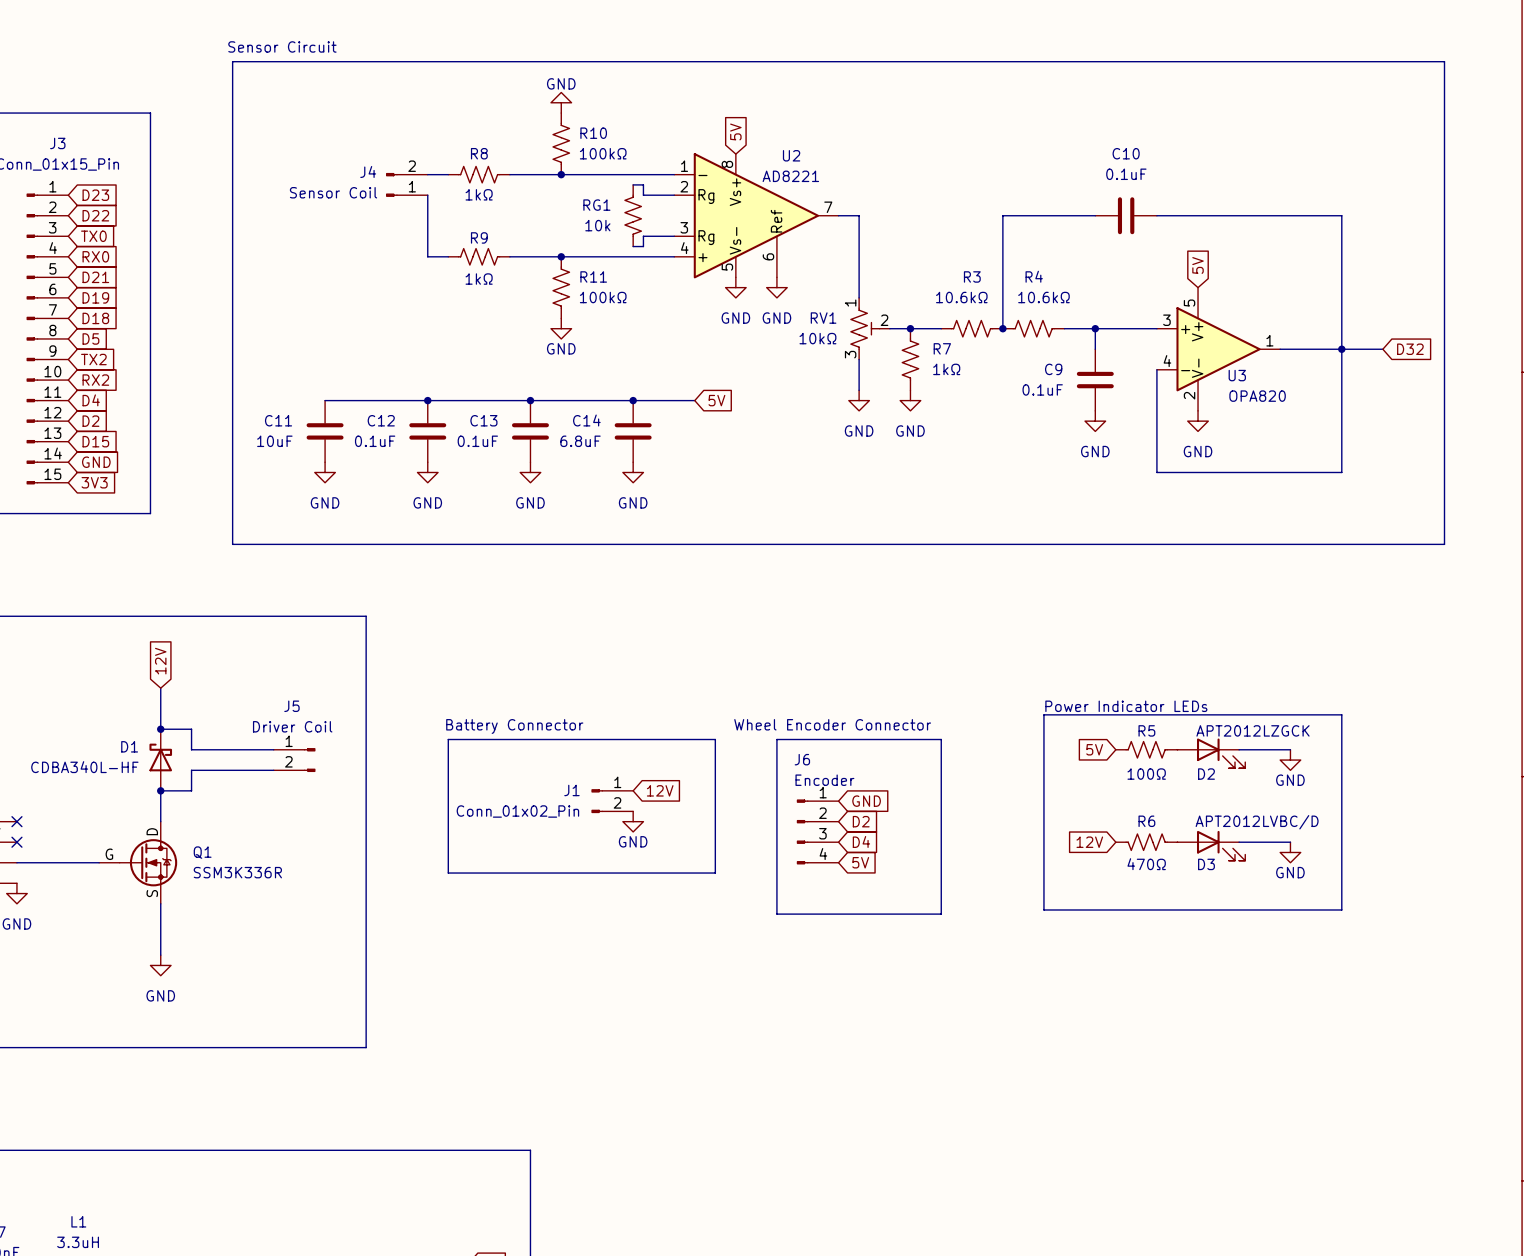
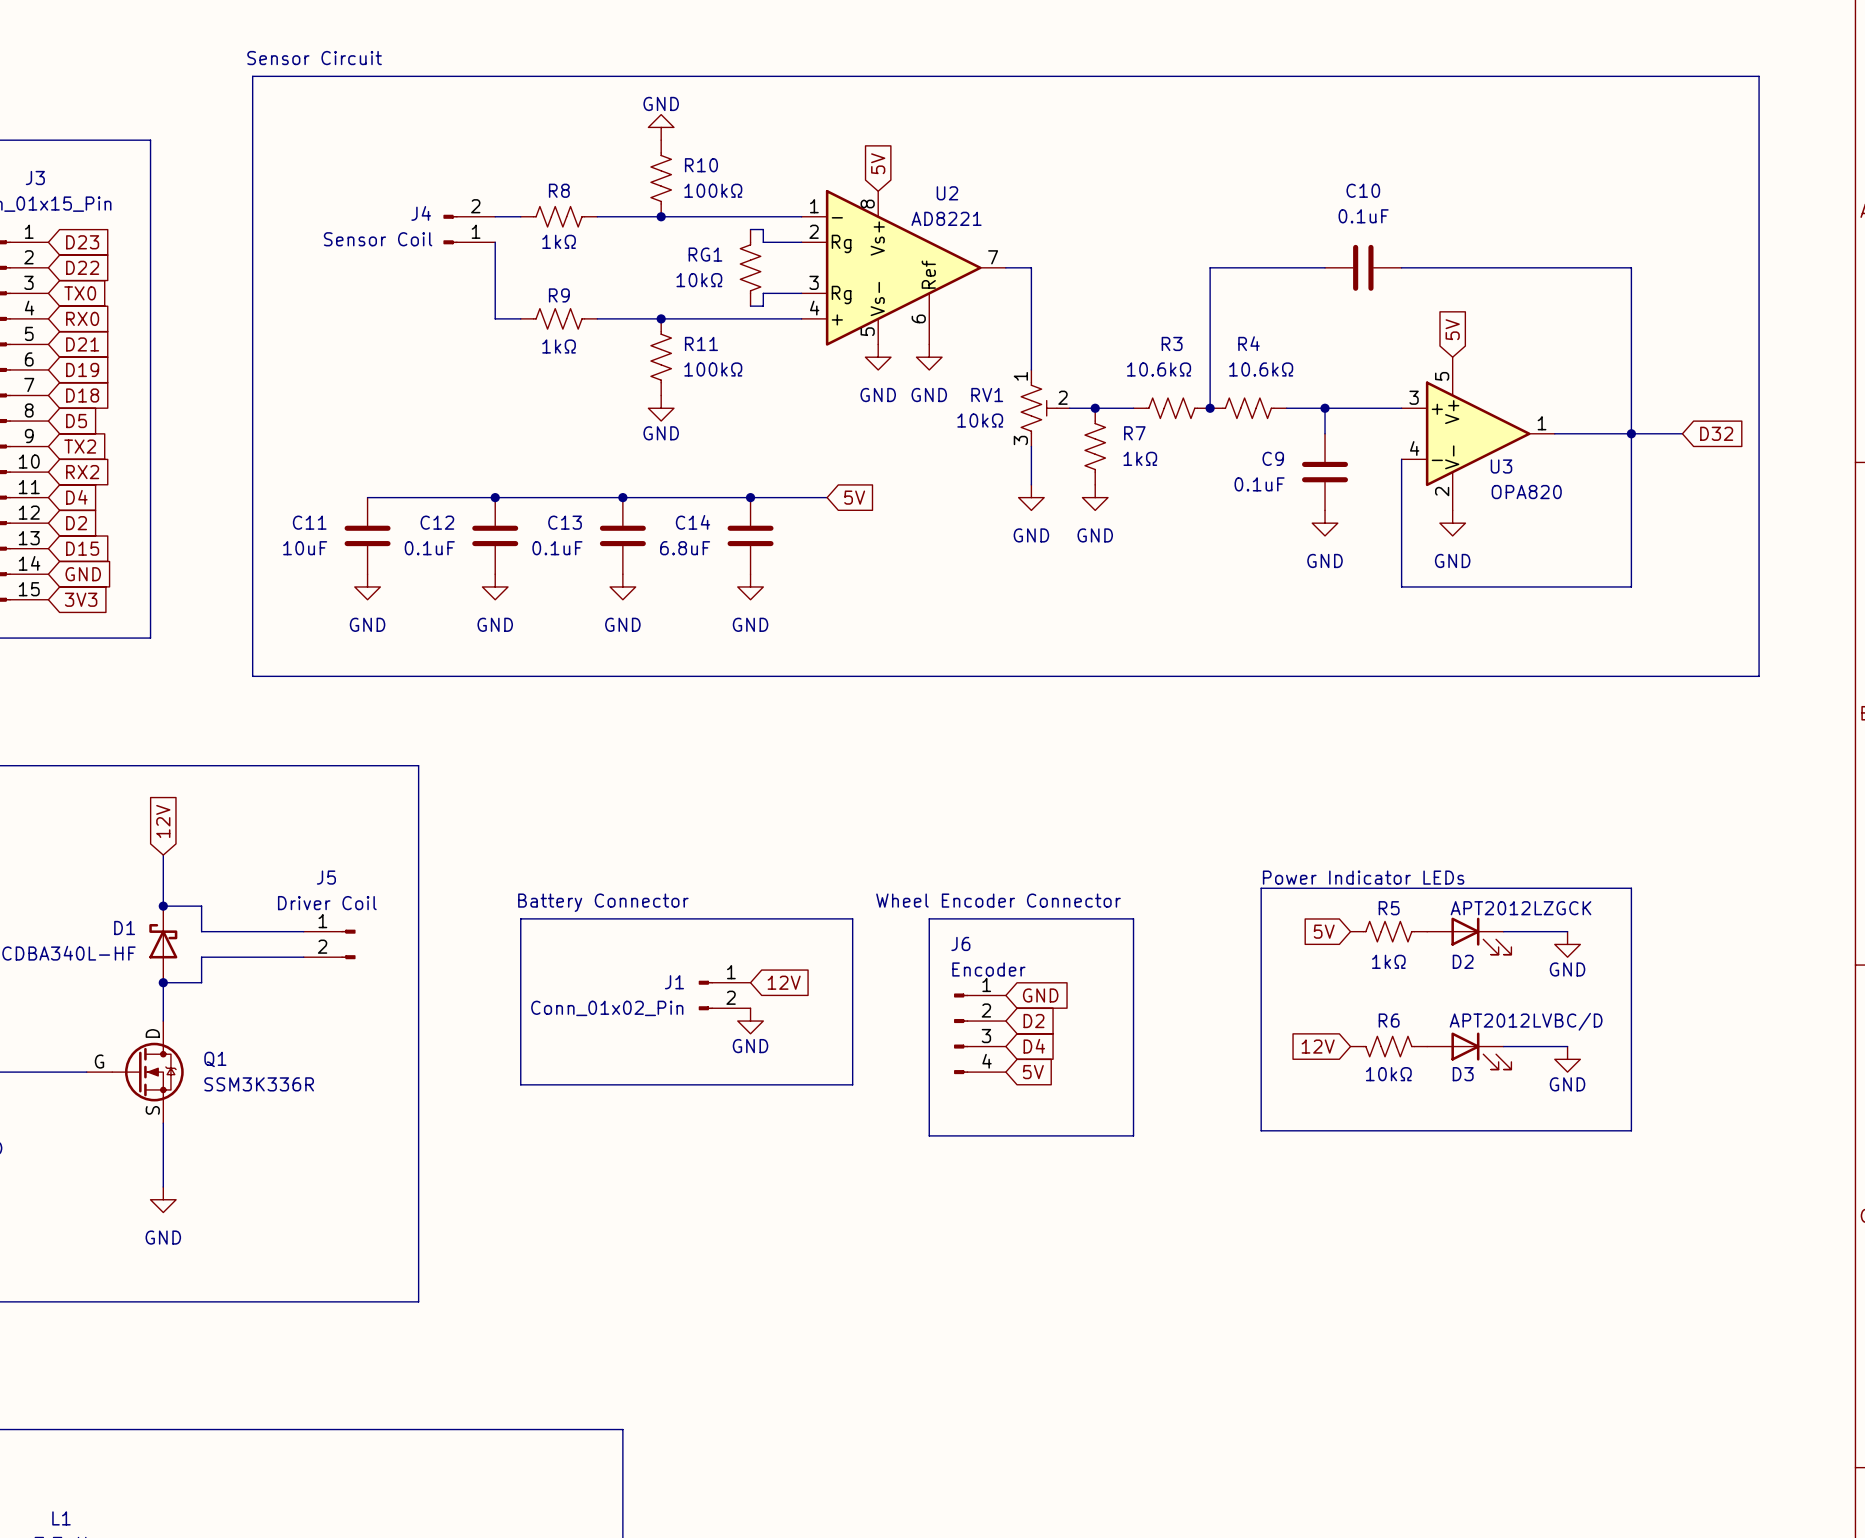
RG1 value: 10k (597, 225) -> 10kΩ (699, 280)
R5 value: 100Ω (1146, 774) -> 1kΩ (1388, 961)
R6 value: 470Ω (1146, 864) -> 10kΩ (1388, 1074)

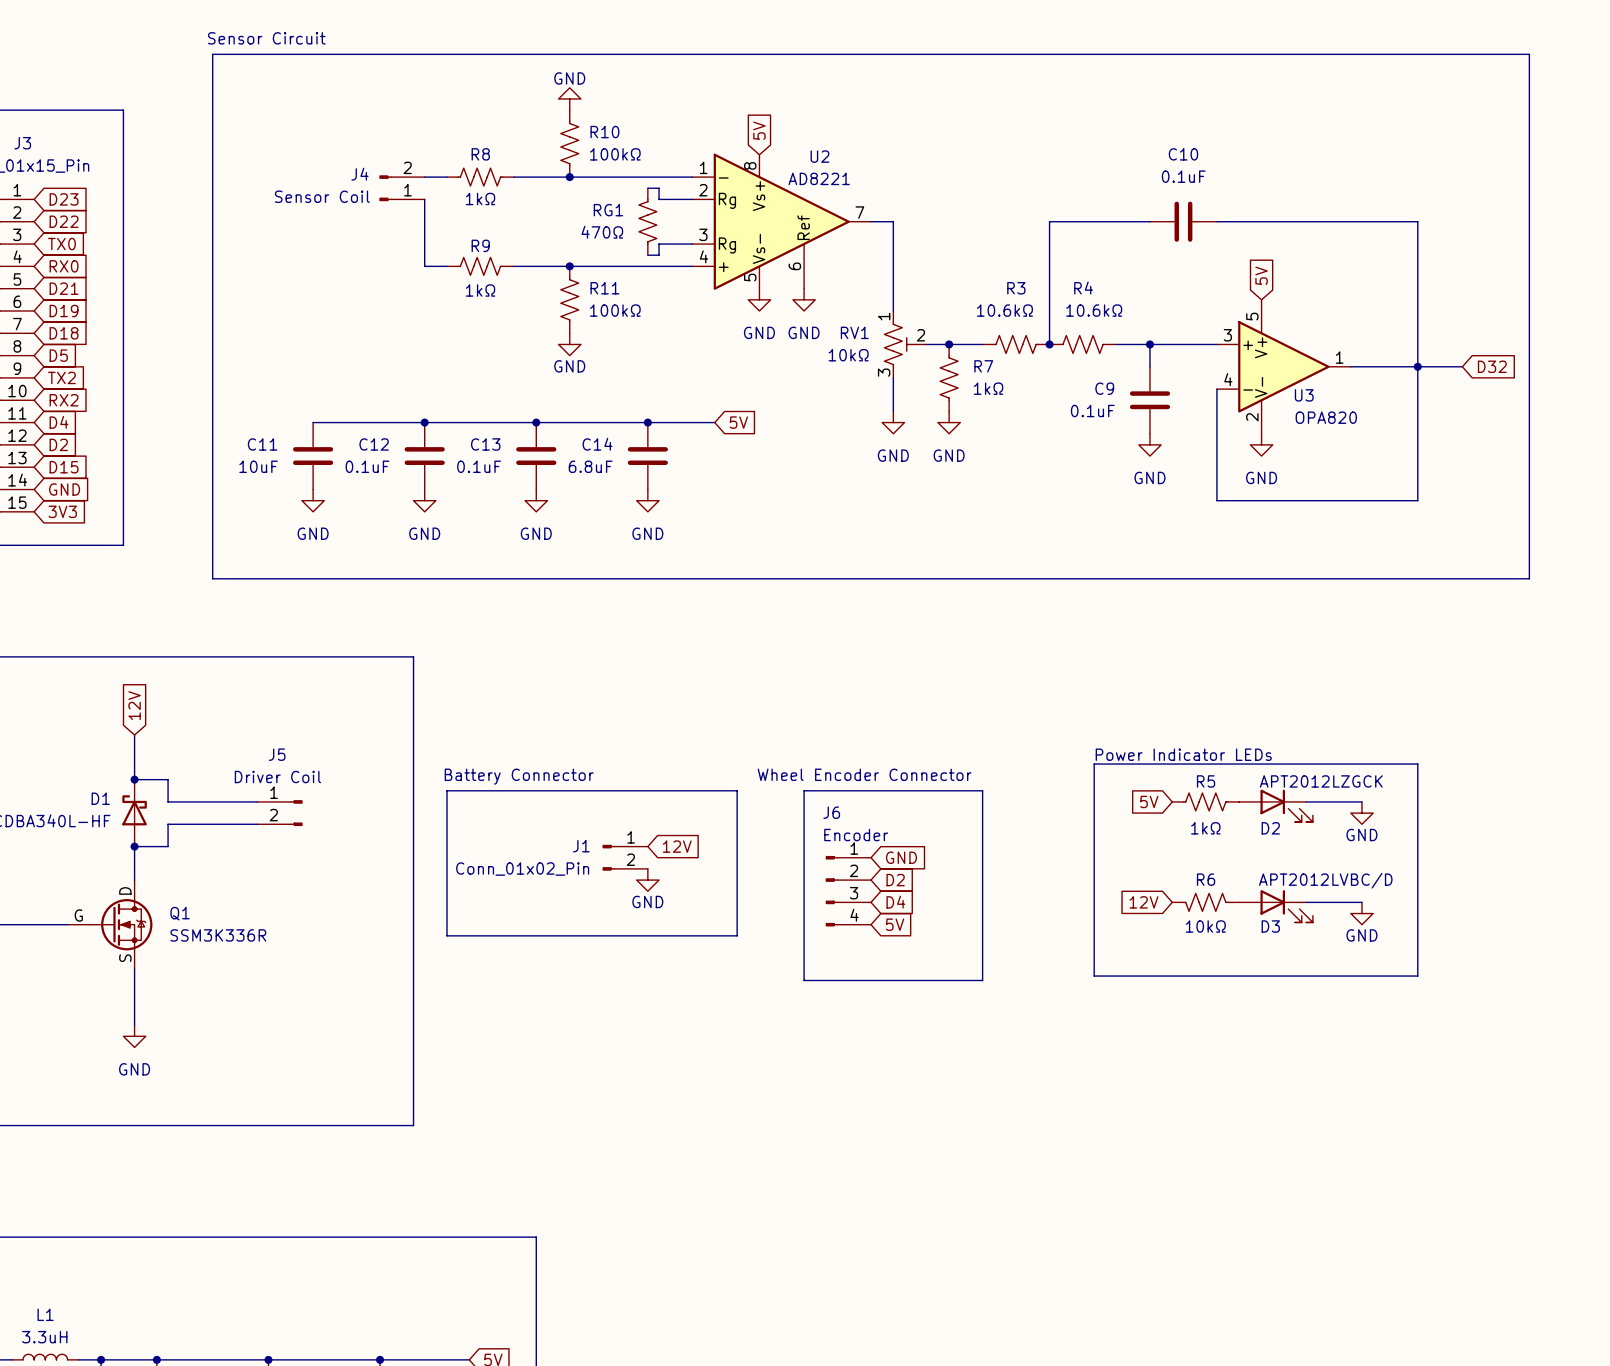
RG1 value: 10kΩ (699, 280) -> 470Ω (602, 232)
line: (418, 765) (418, 1301) -> (357, 656) (413, 656) (413, 1125) (357, 1125)

